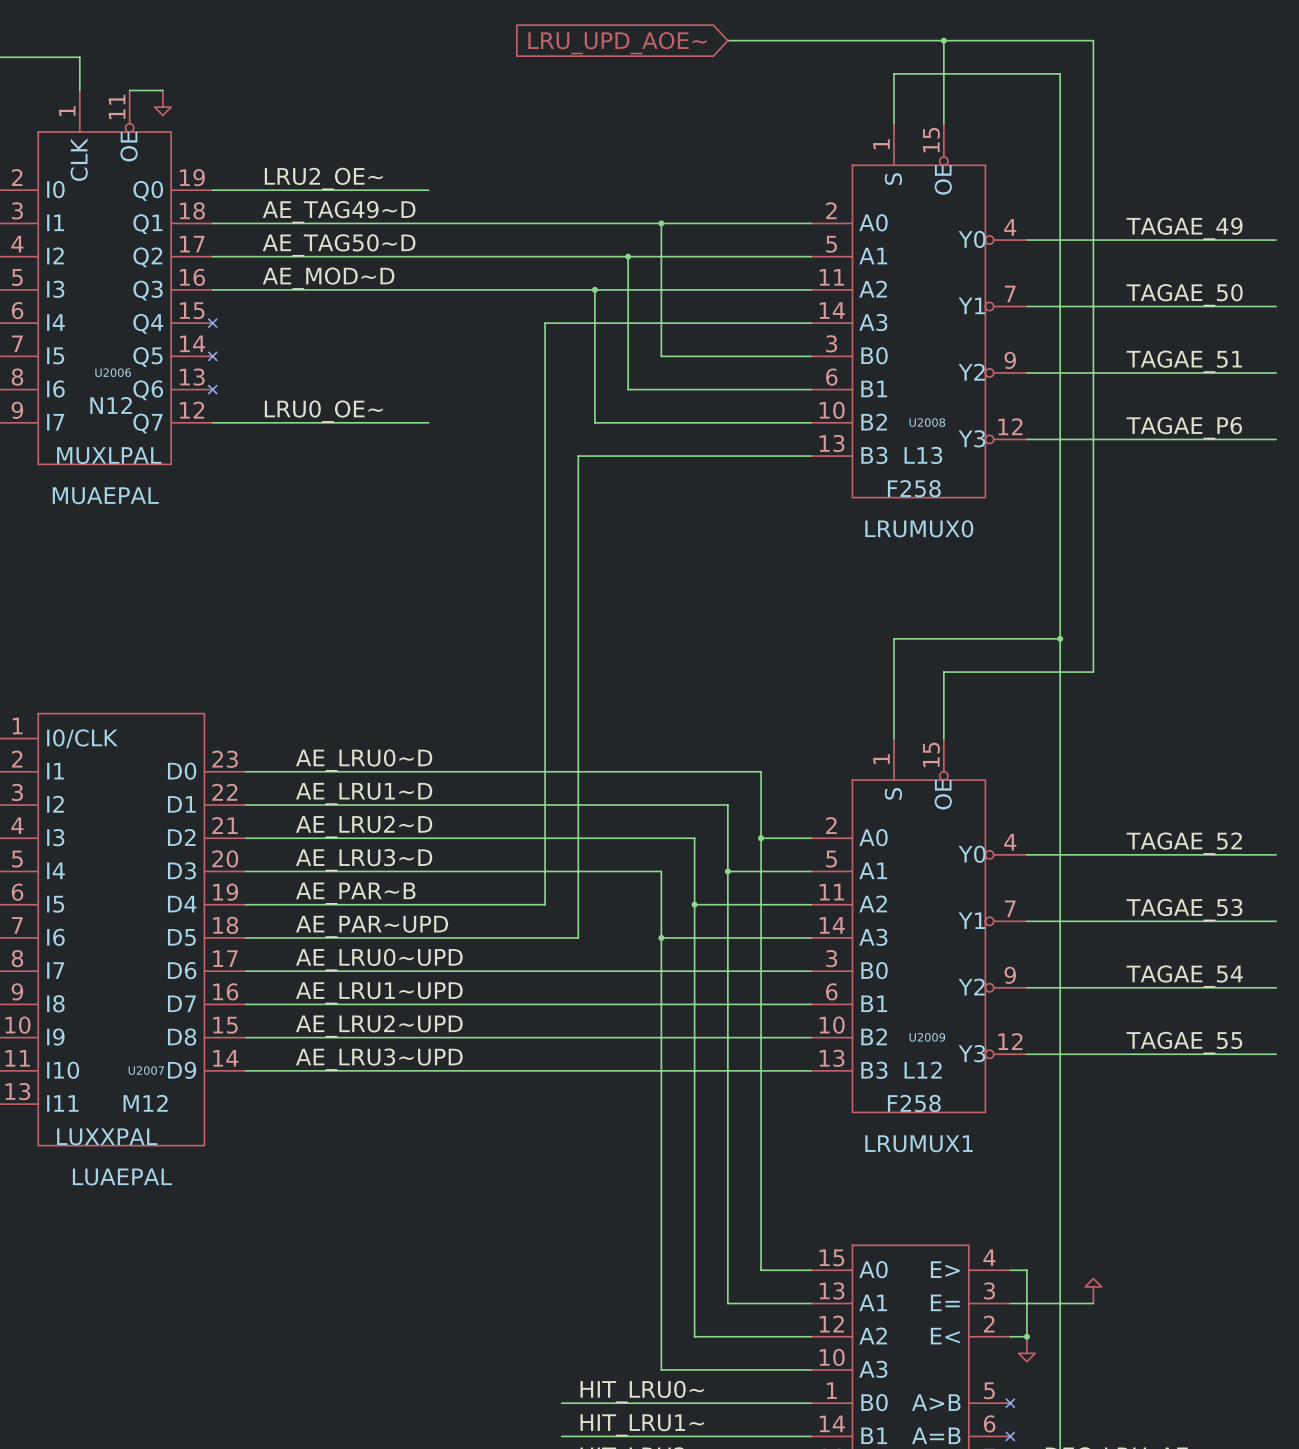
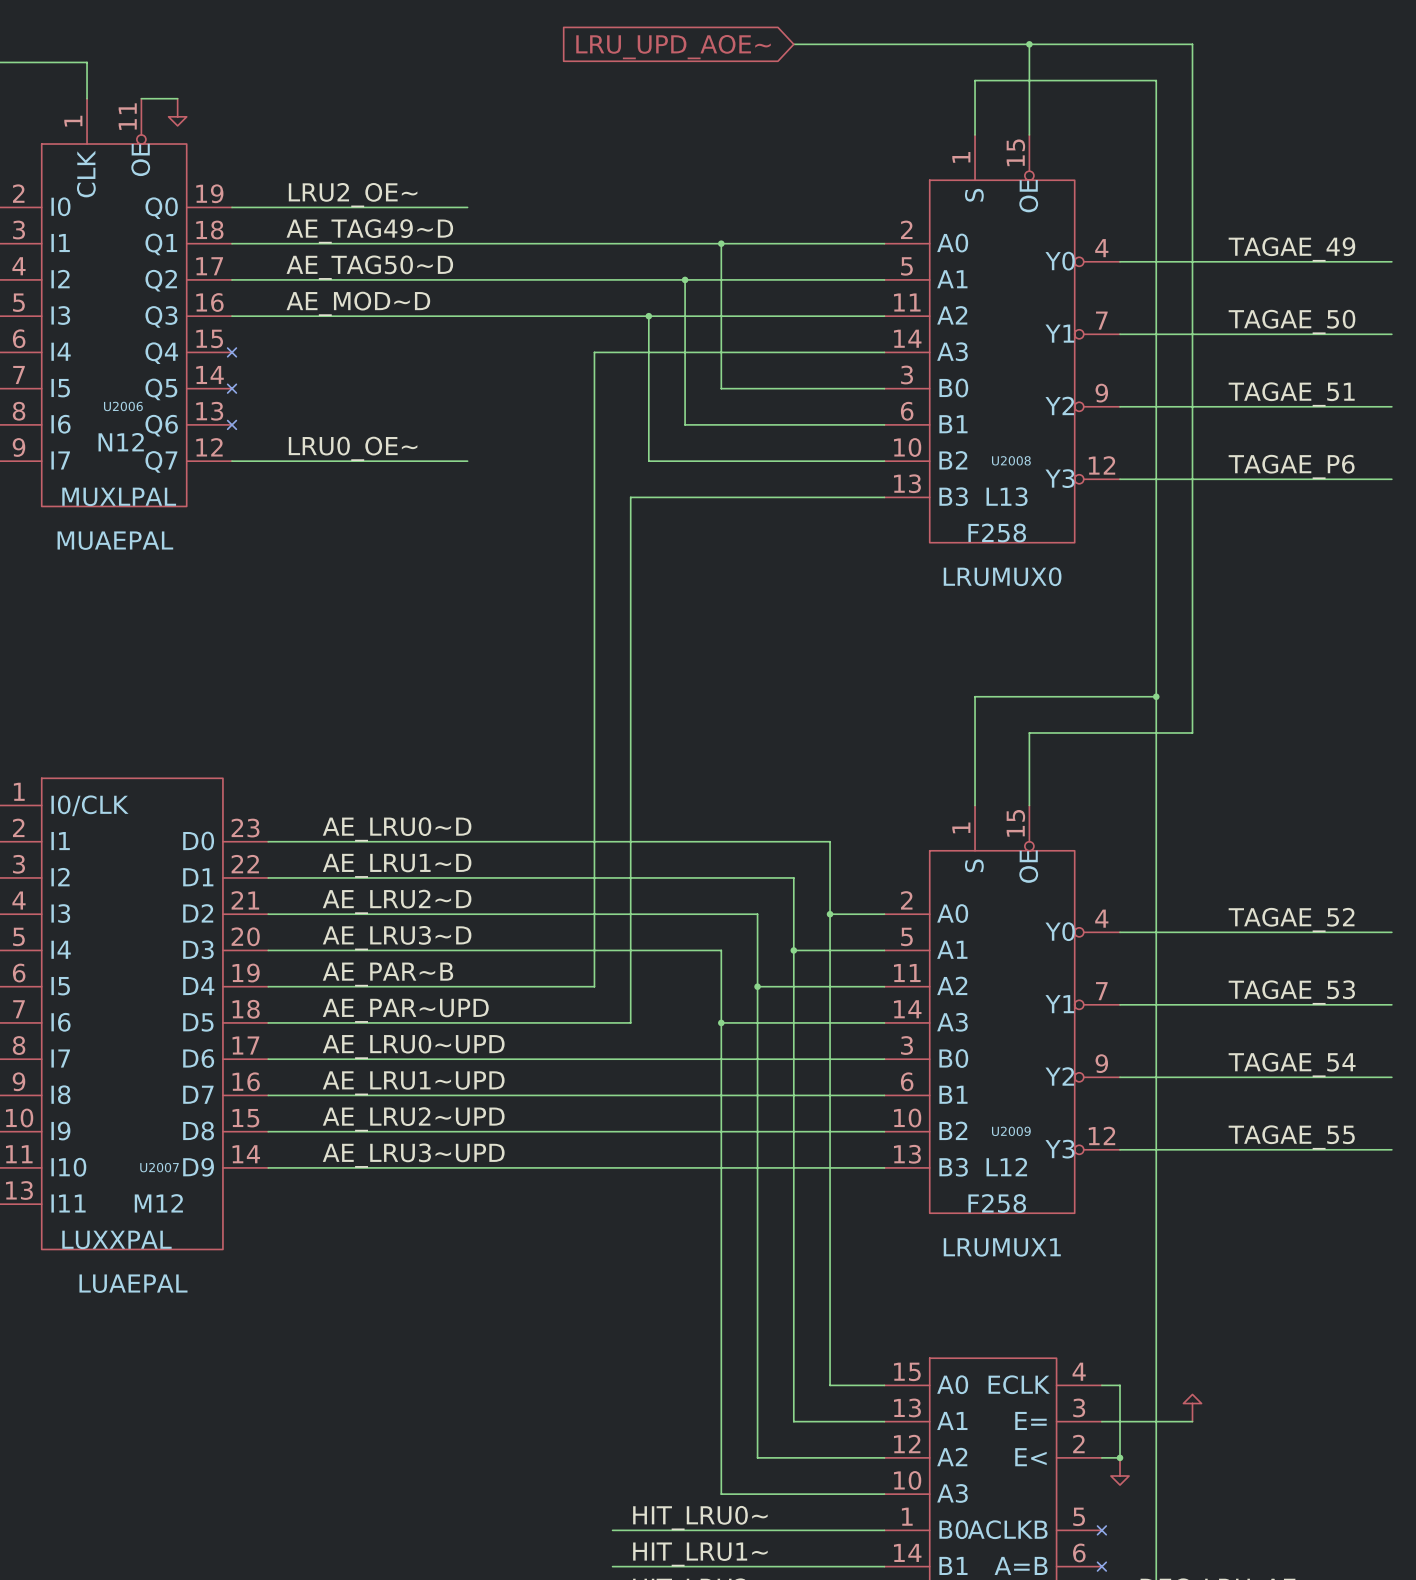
part pin name: E> (945, 1269) -> ECLK (1019, 1384)
part pin name: A>B (936, 1402) -> ACLKB (1007, 1529)

